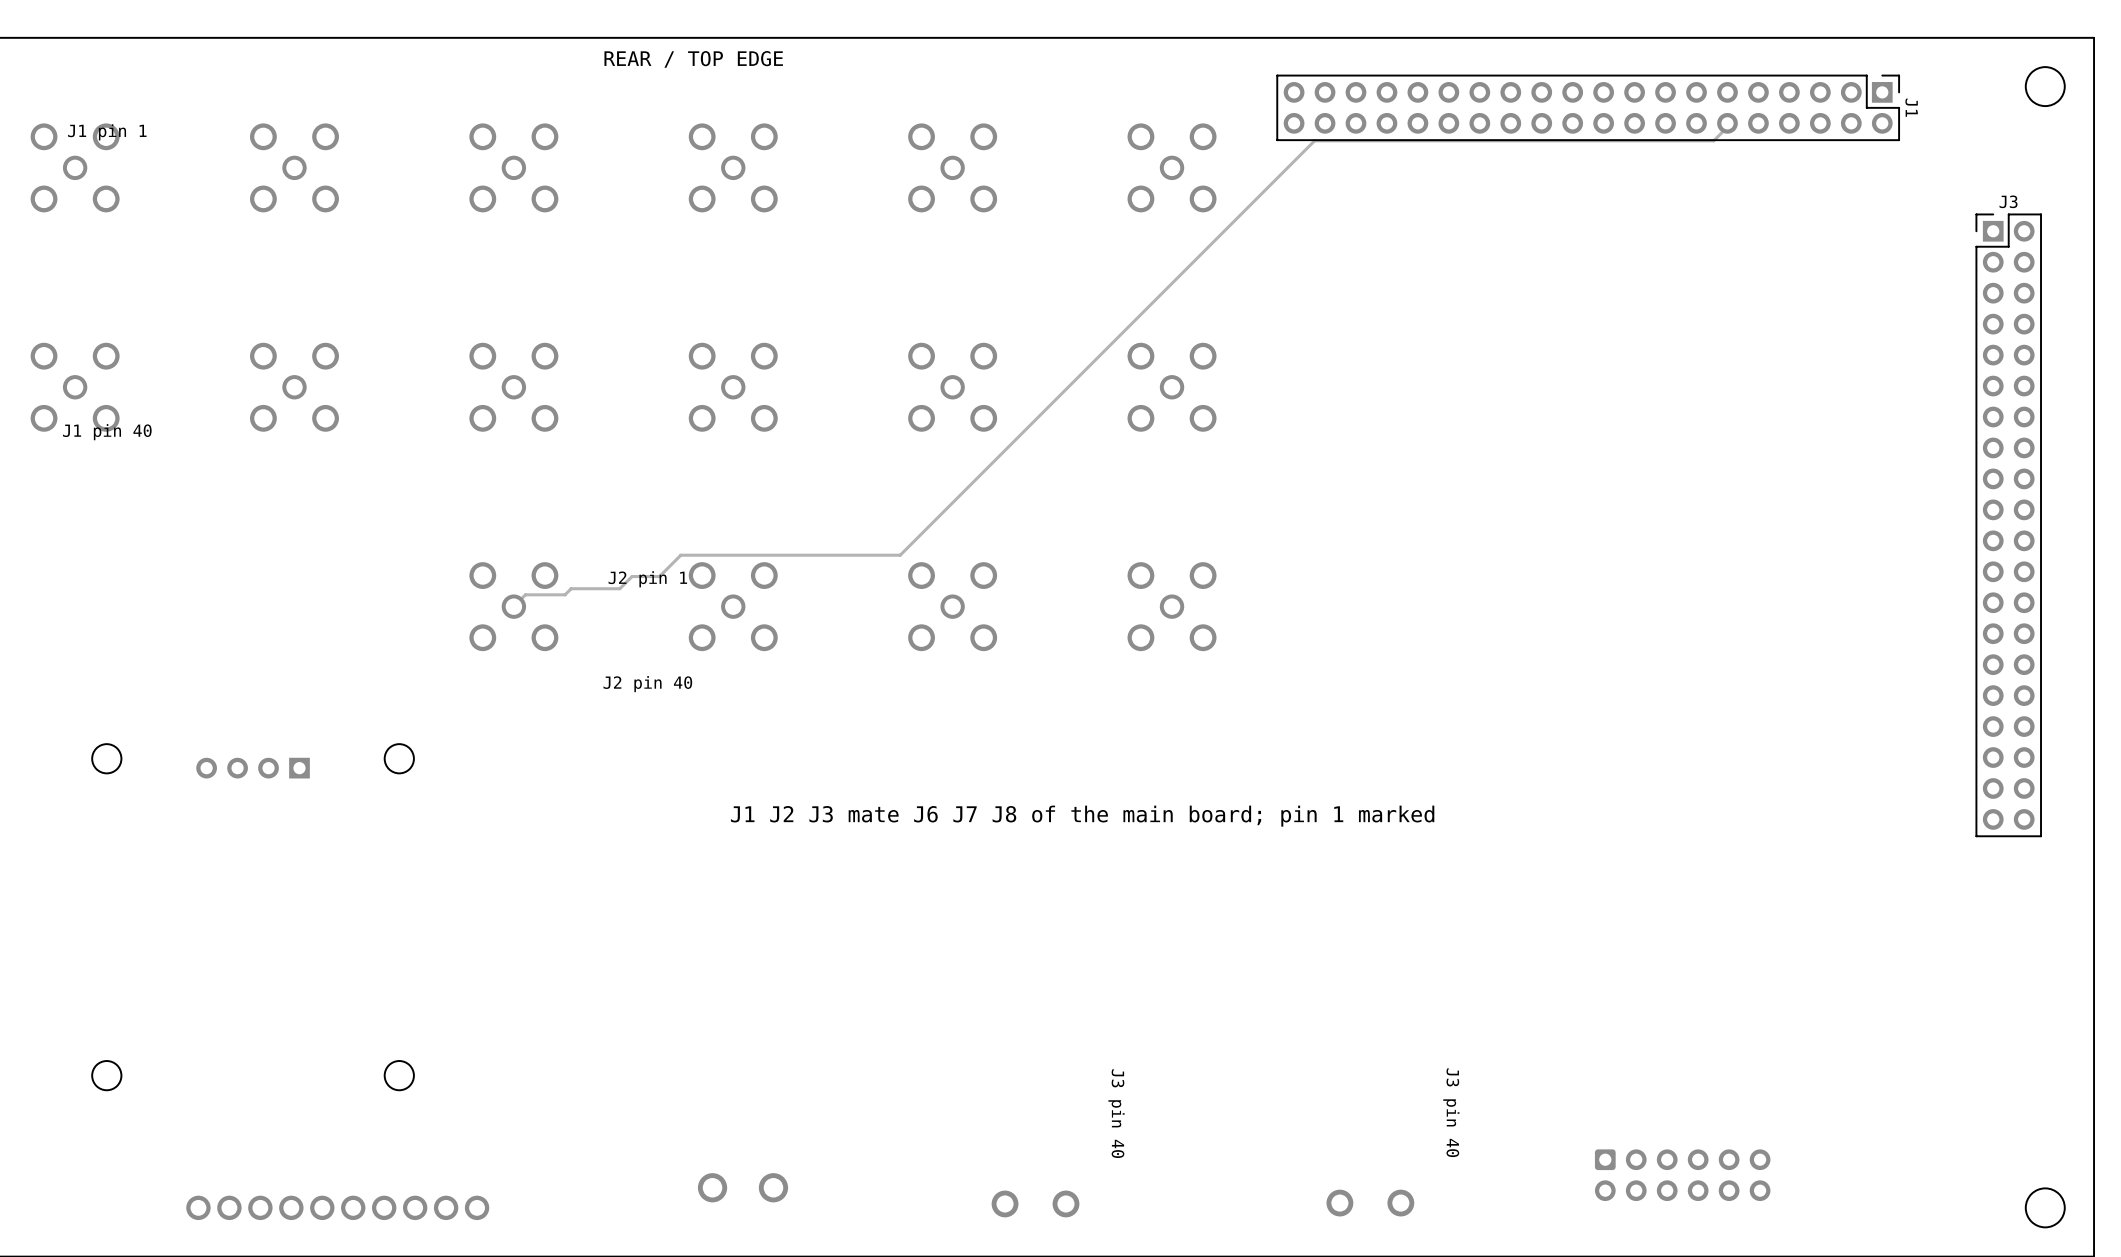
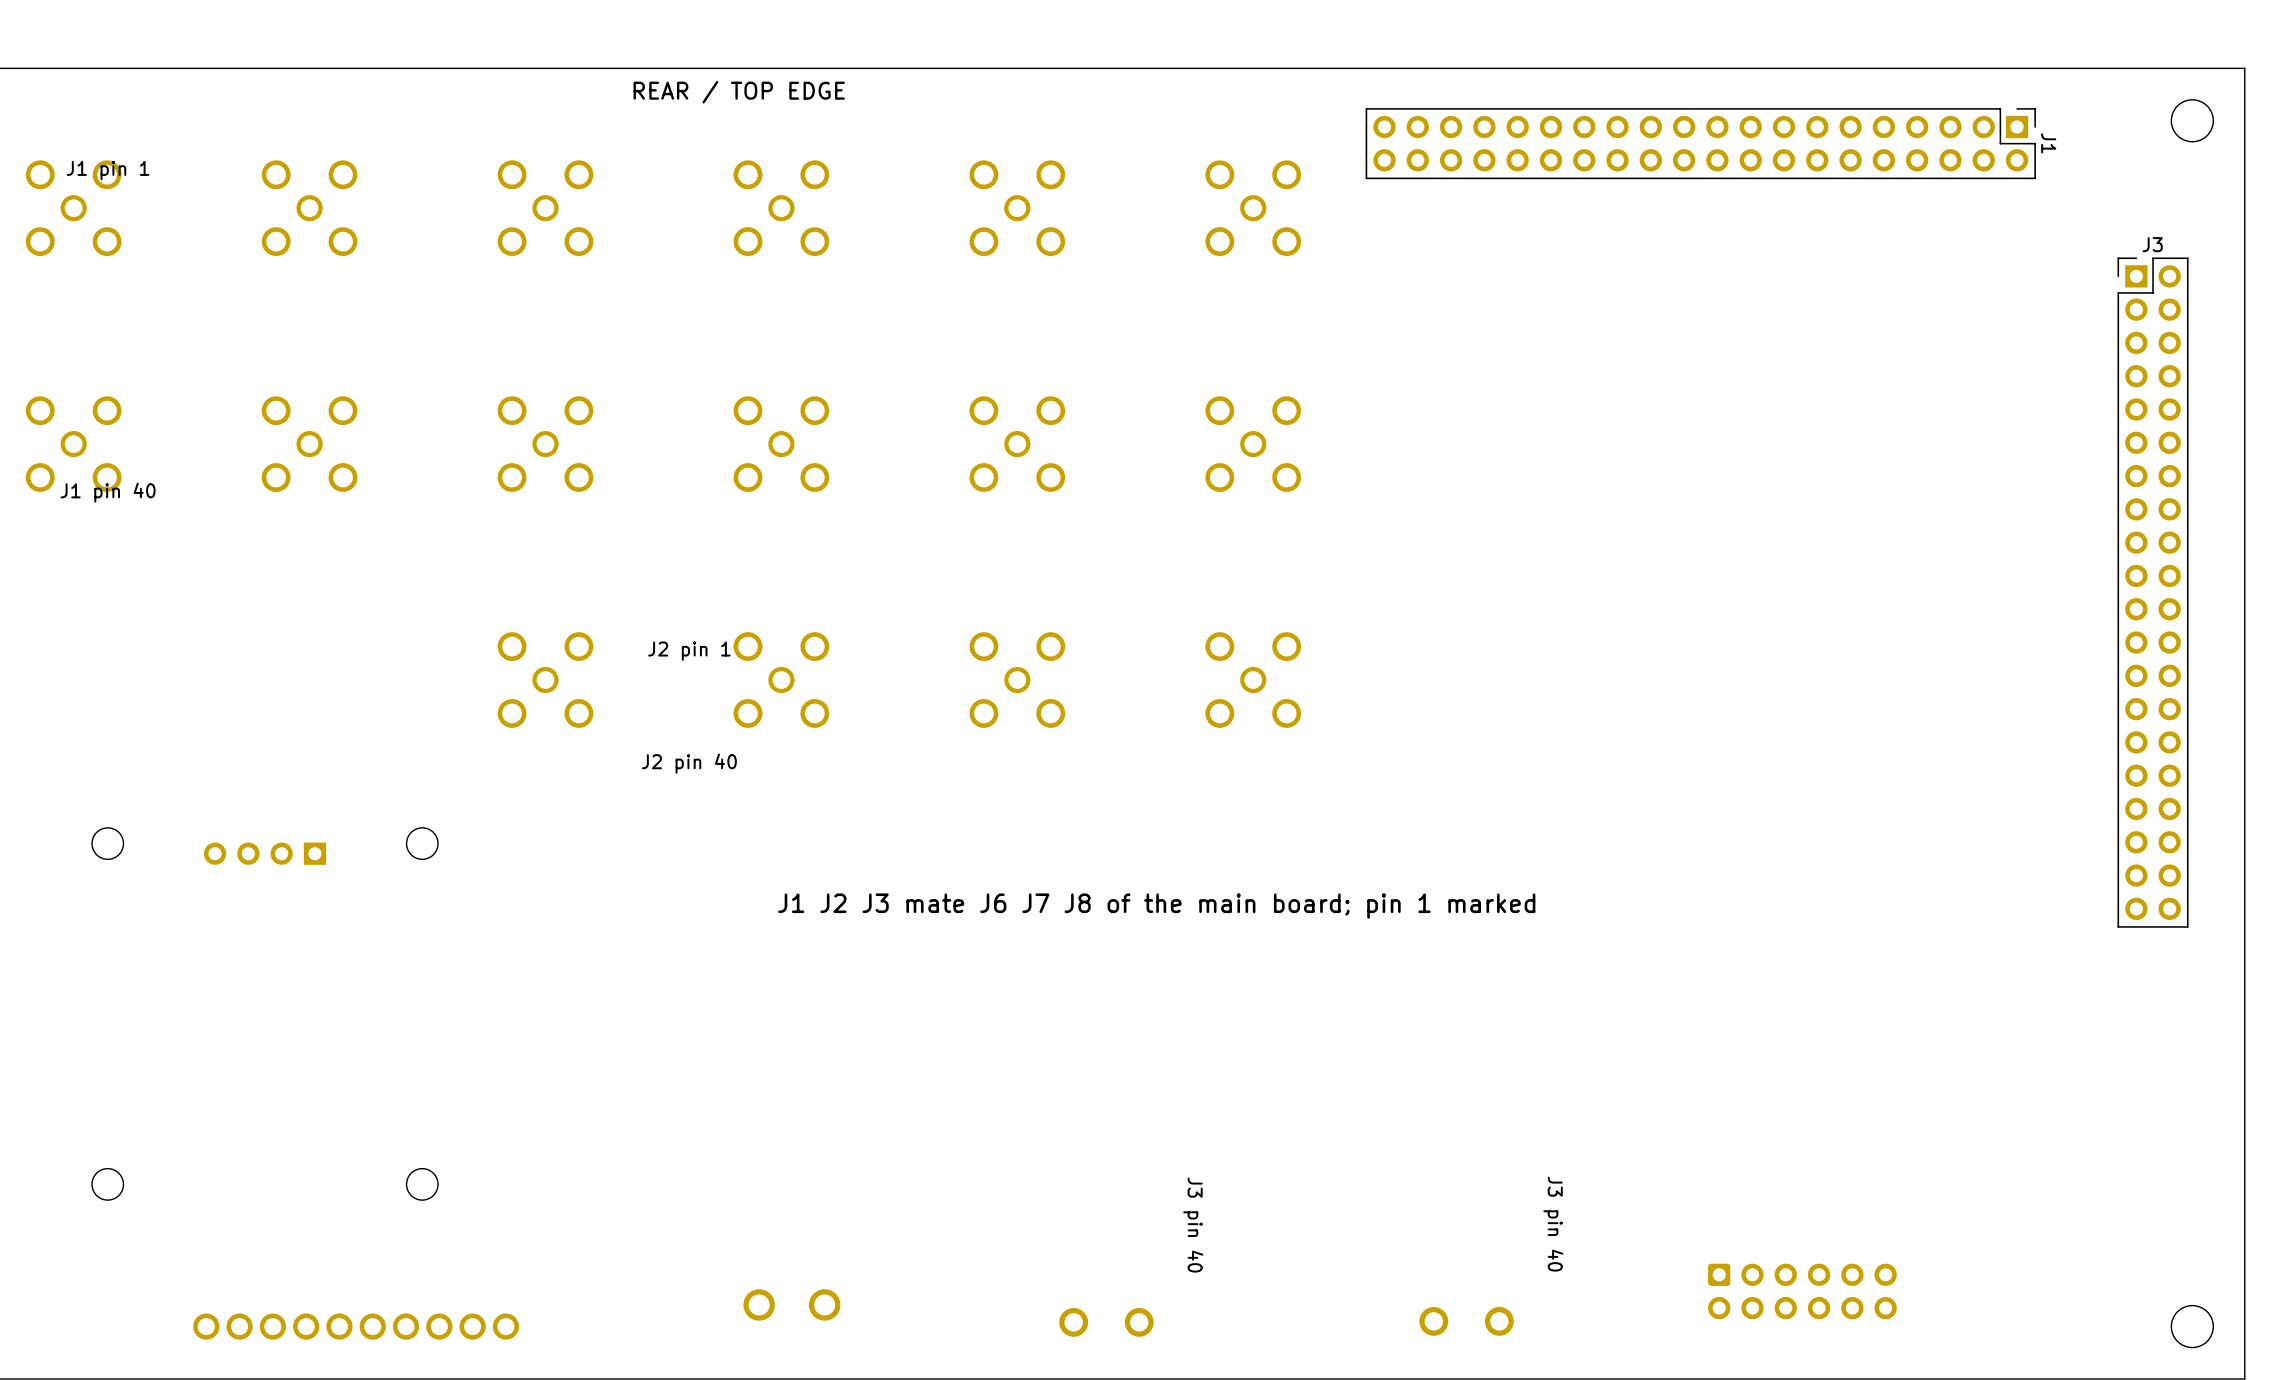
track: (1727, 123) (1727, 127) (1713, 140) (1314, 140) (900, 555) (680, 555) (659, 576) (632, 576) (619, 588) (571, 588) (565, 594) (525, 594) (513, 606) -> none

